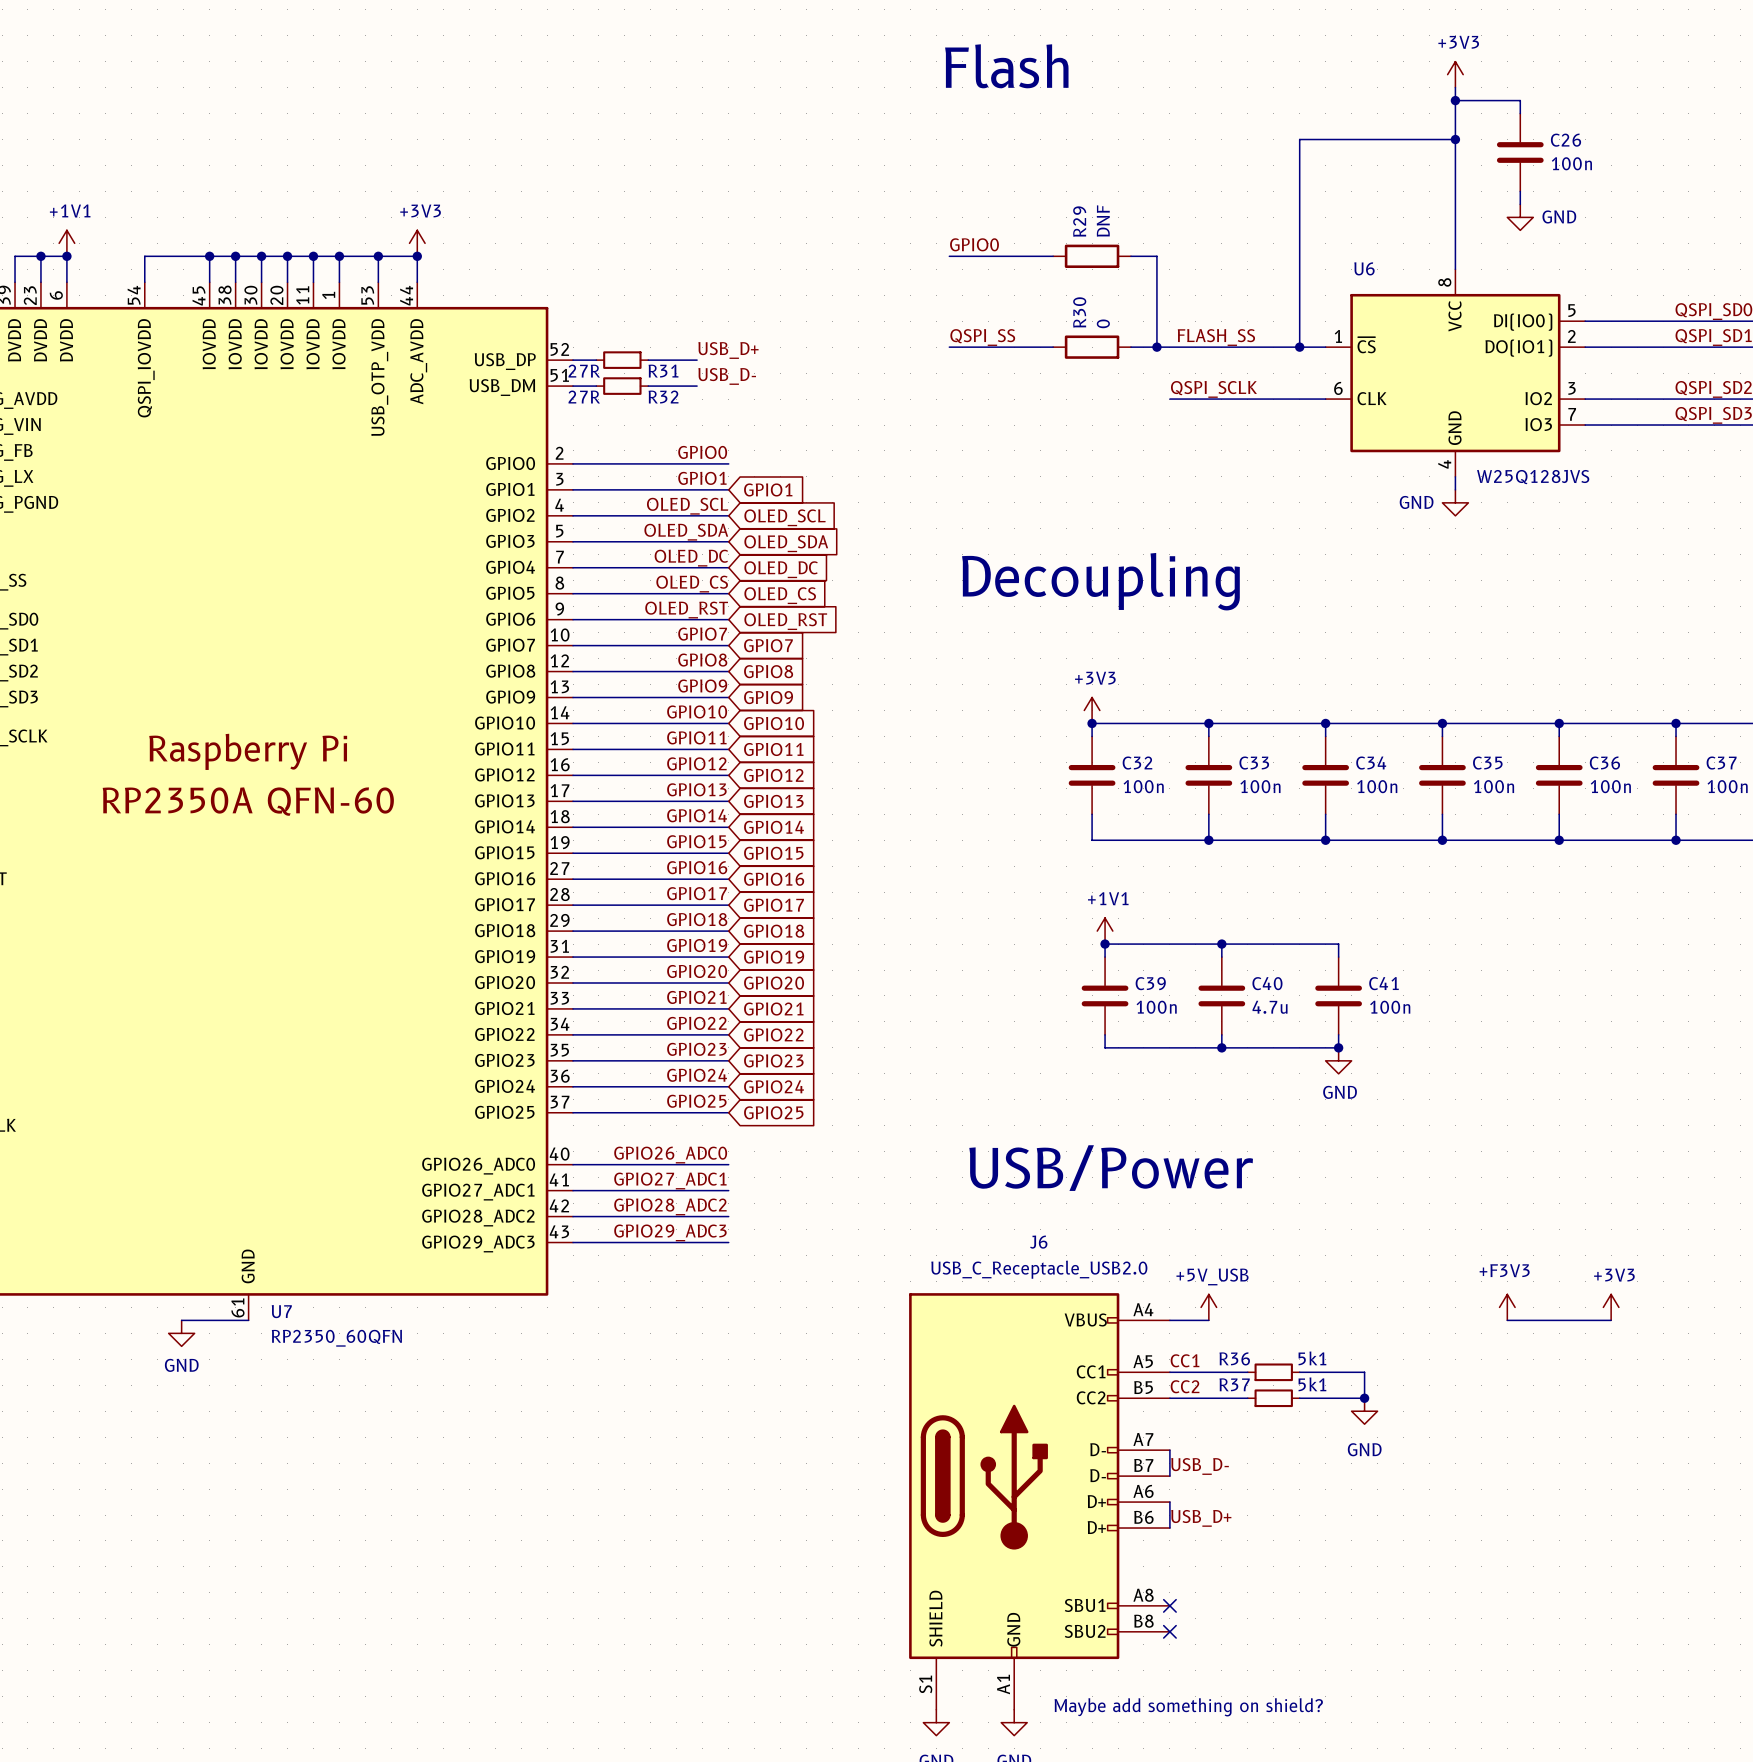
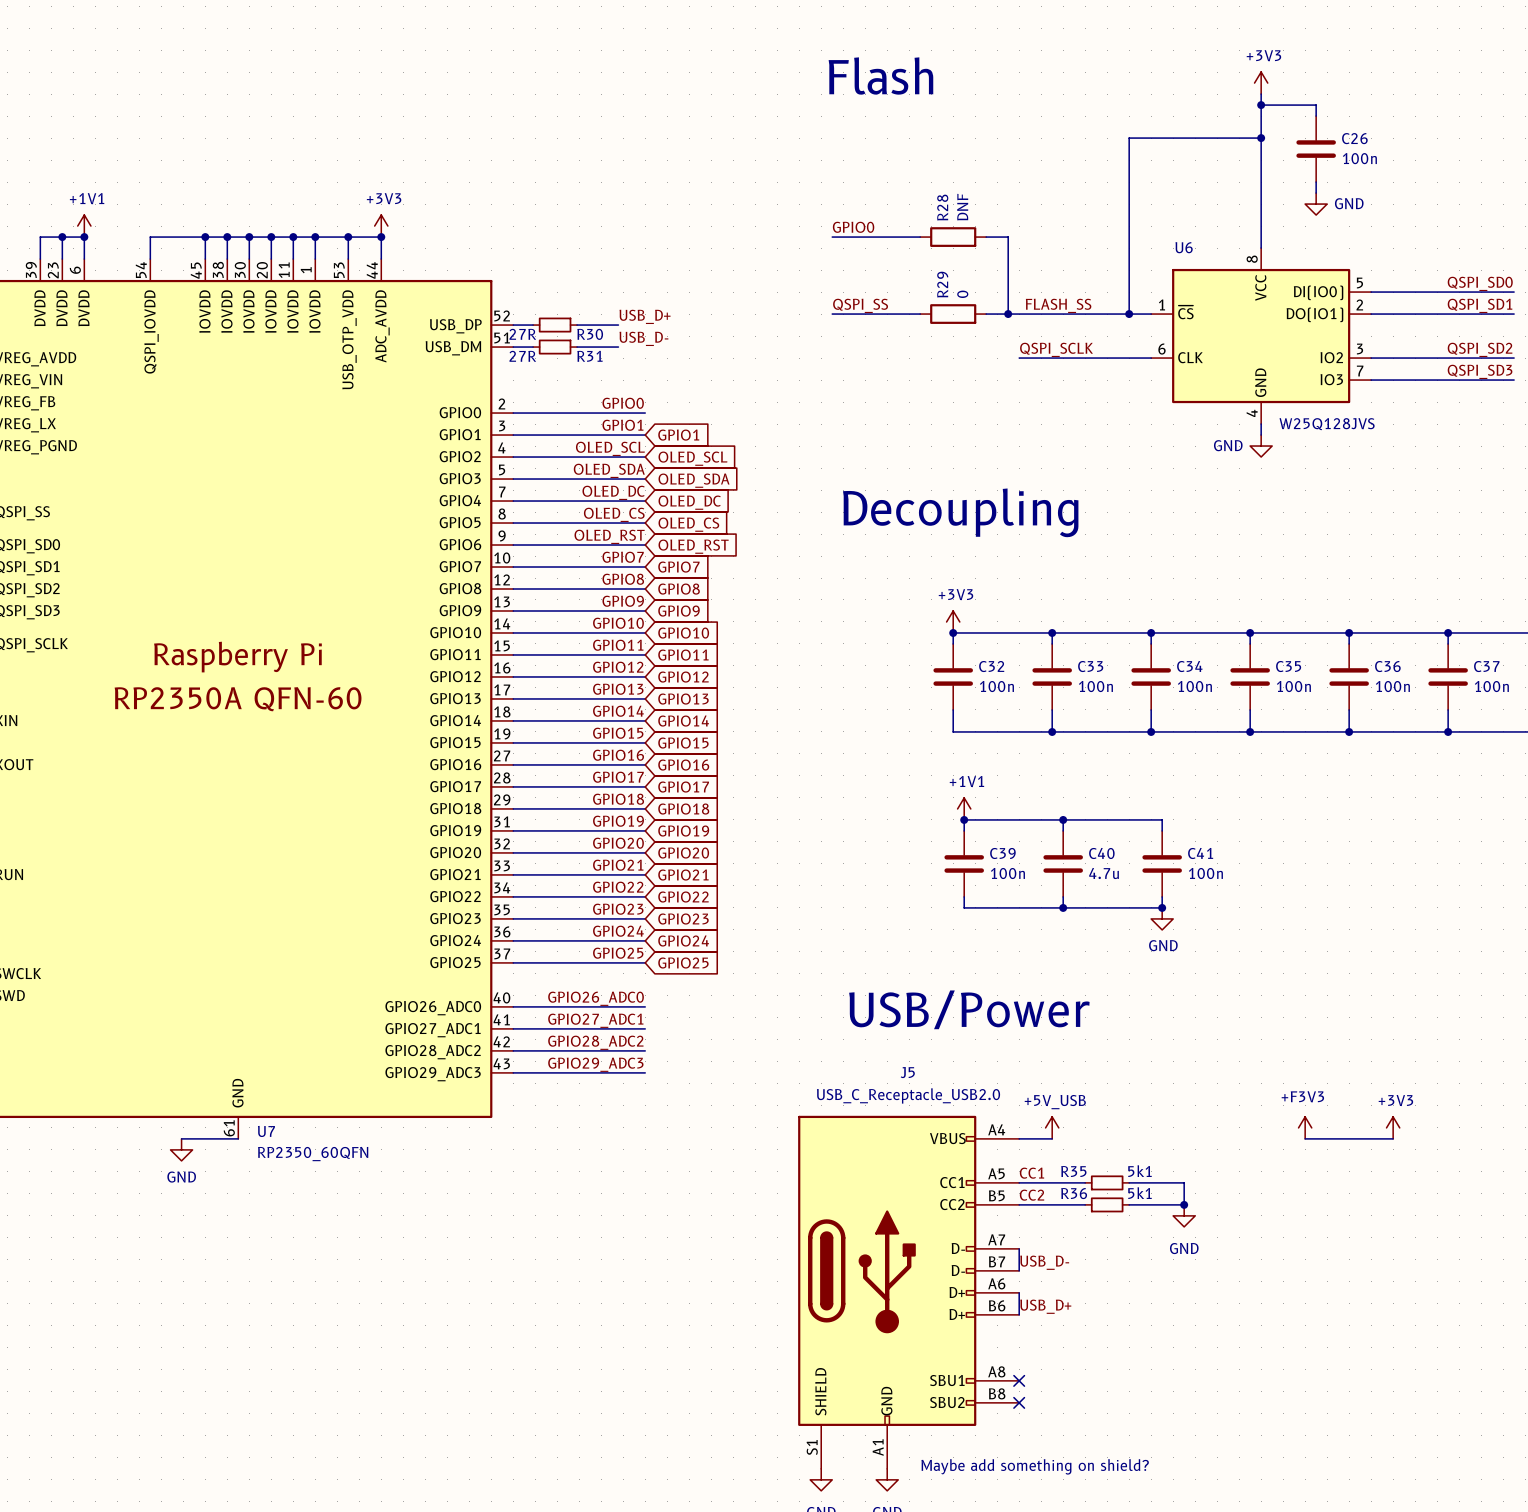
R29 name: R29 (1079, 221) -> R28 (942, 207)
R30 name: R30 (1079, 312) -> R29 (942, 284)
R31 name: R31 (663, 371) -> R30 (590, 334)
R32 name: R32 (663, 397) -> R31 (589, 356)
J6 name: J6 (1038, 1242) -> J5 (907, 1072)
R36 name: R36 (1234, 1358) -> R35 (1073, 1171)
R37 name: R37 (1234, 1384) -> R36 (1074, 1193)

